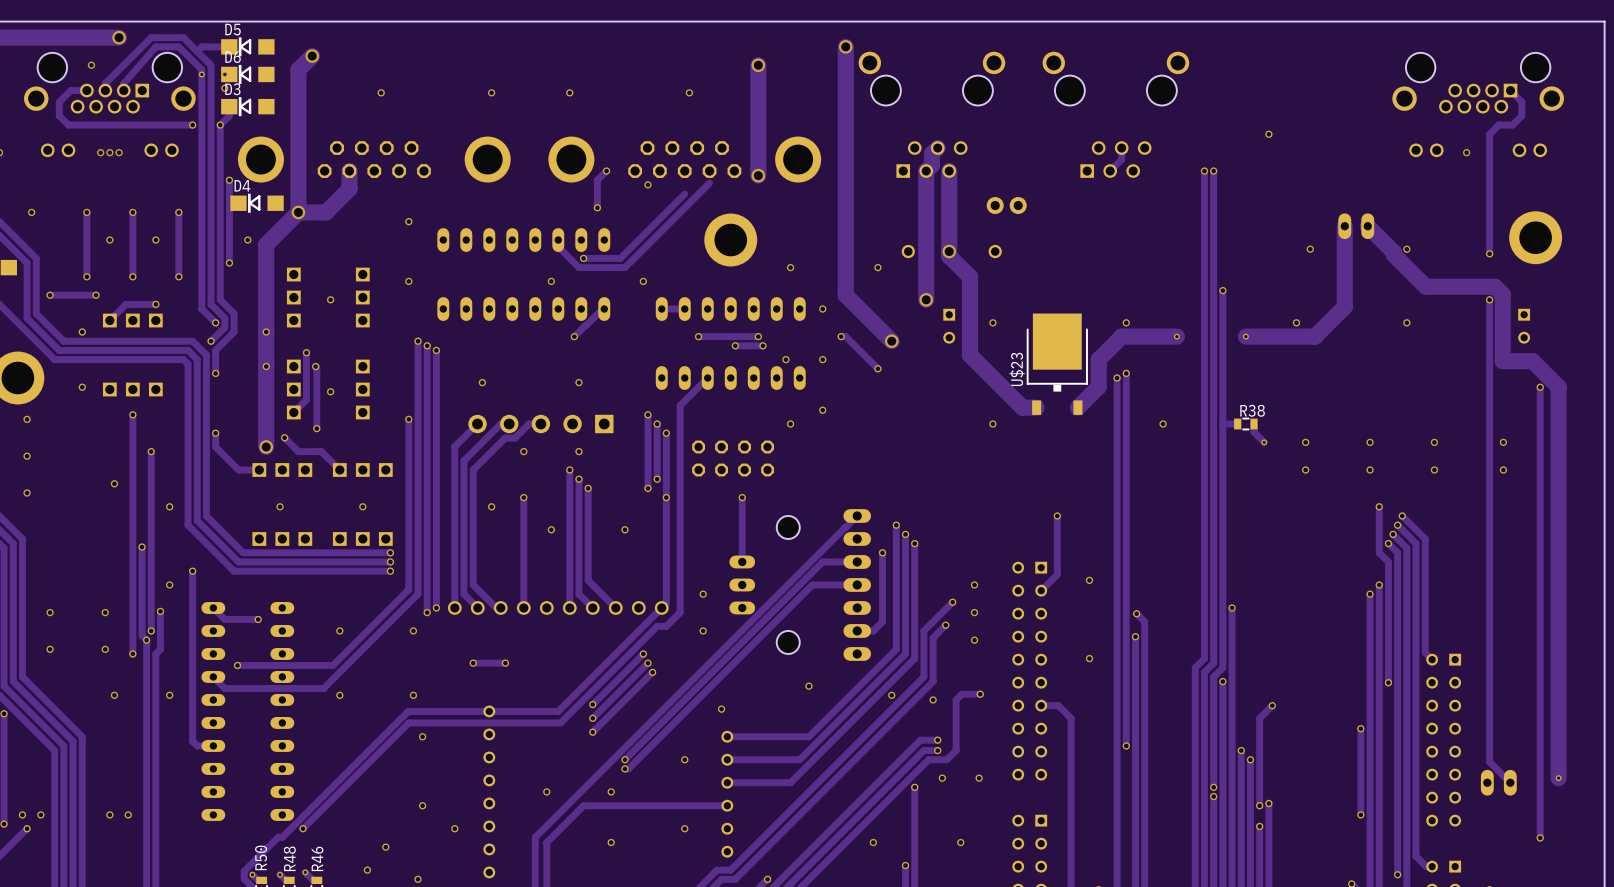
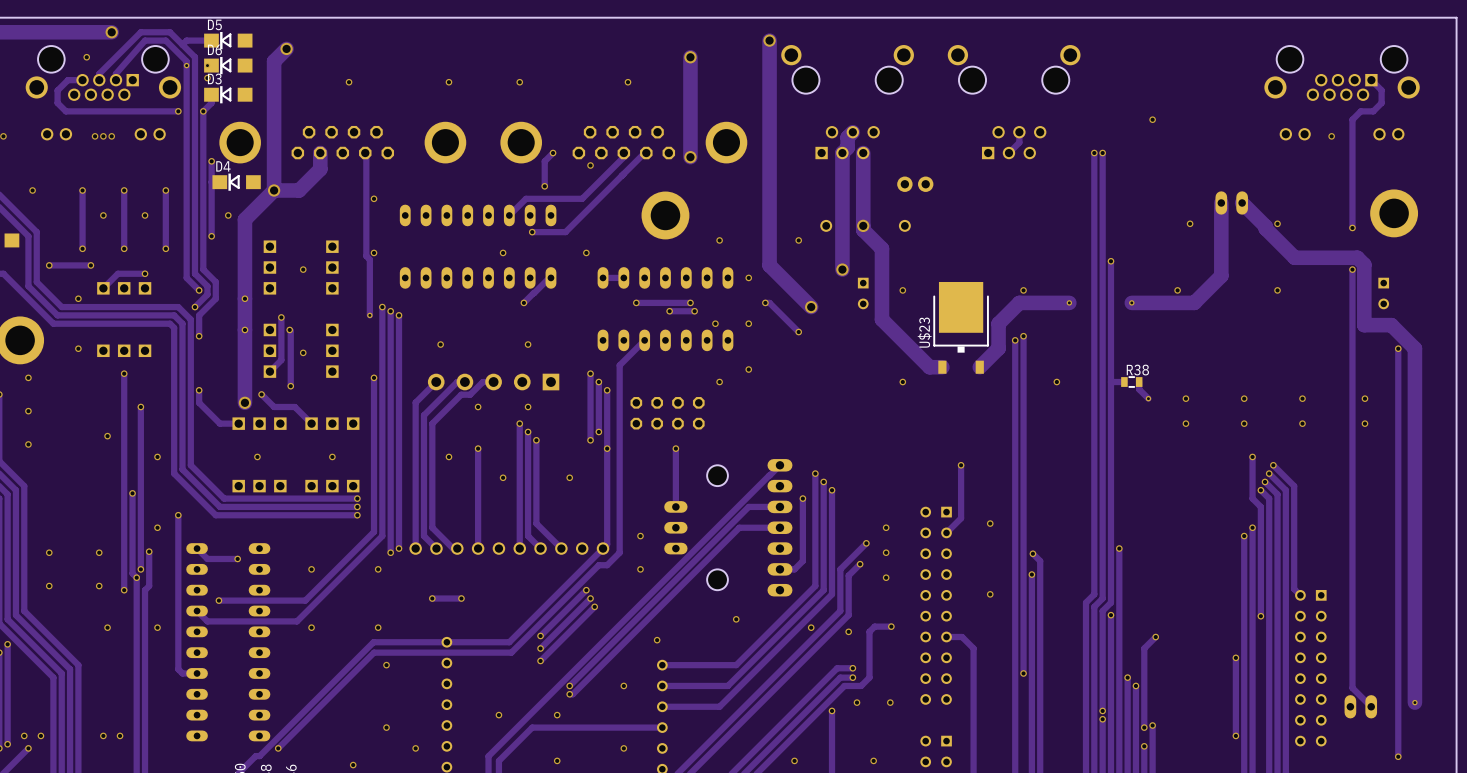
track: none -> (365, 153) (366, 256) (369, 259) (369, 315)
track: none -> (646, 153) (623, 173)
track: (709, 183) (624, 267) (578, 267) (558, 246) (558, 240) -> (623, 153) (623, 157) (582, 198) (525, 198) (509, 215)
via: none -> (369, 315)

